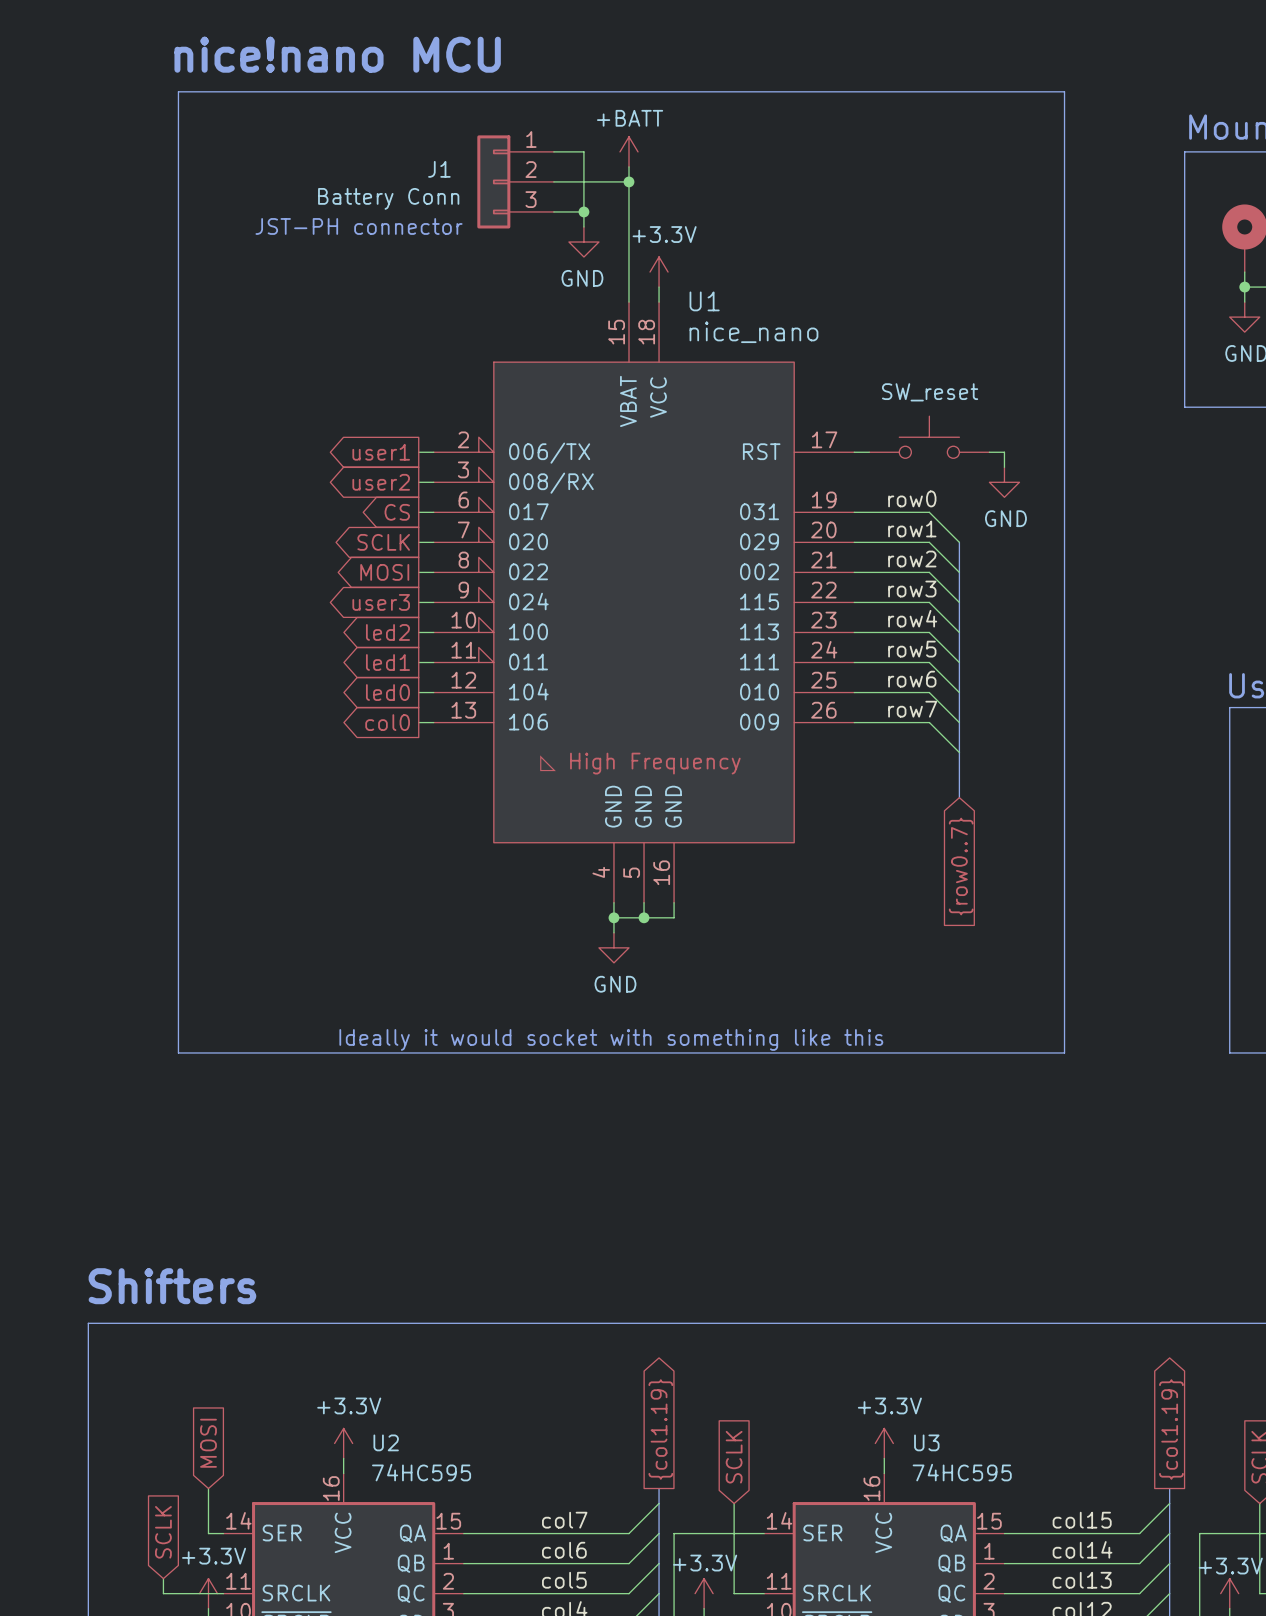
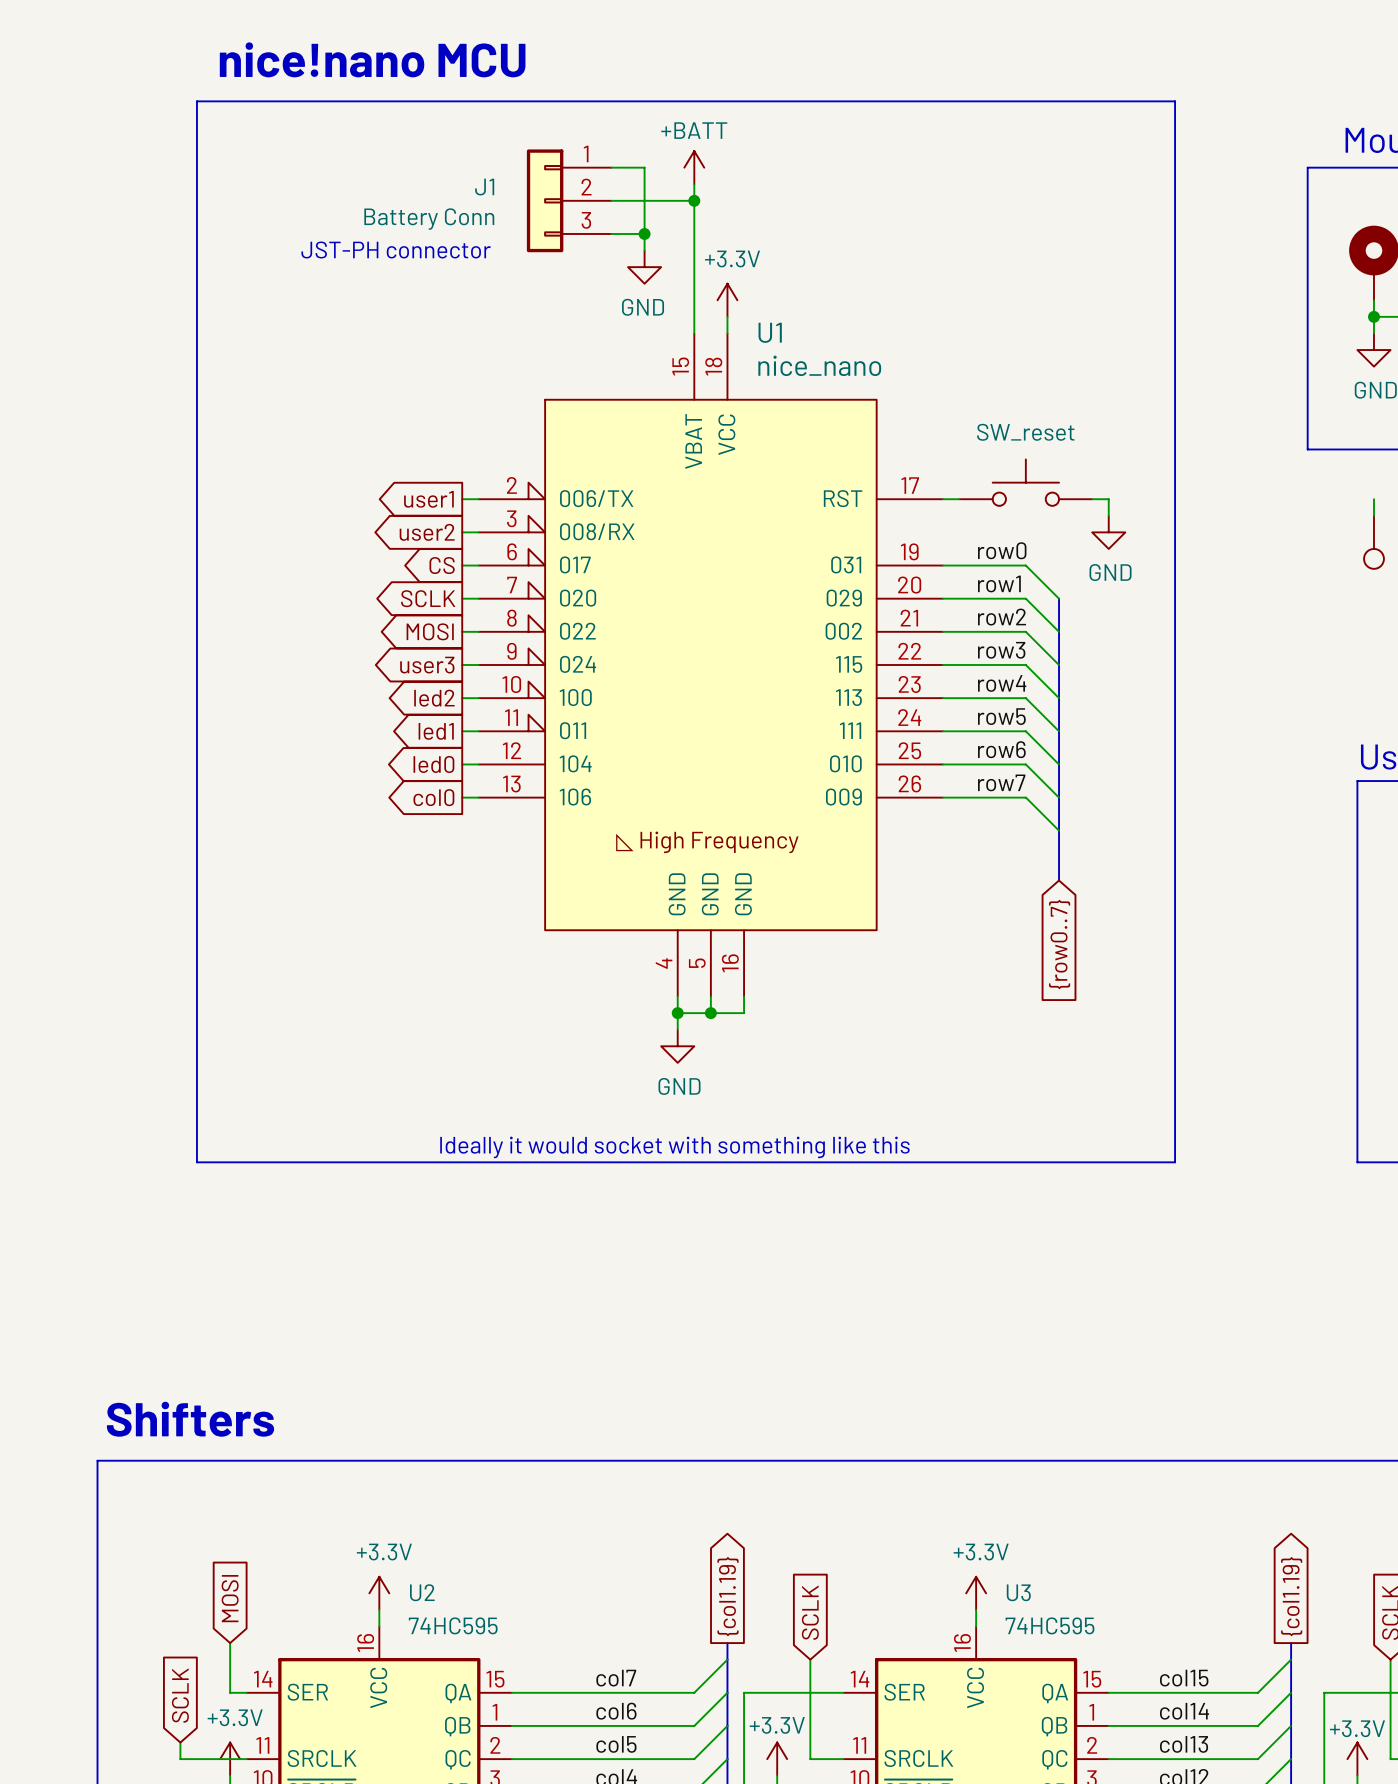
wire: none -> (1373, 499) (1373, 515)
part: none -> (1373, 542)

